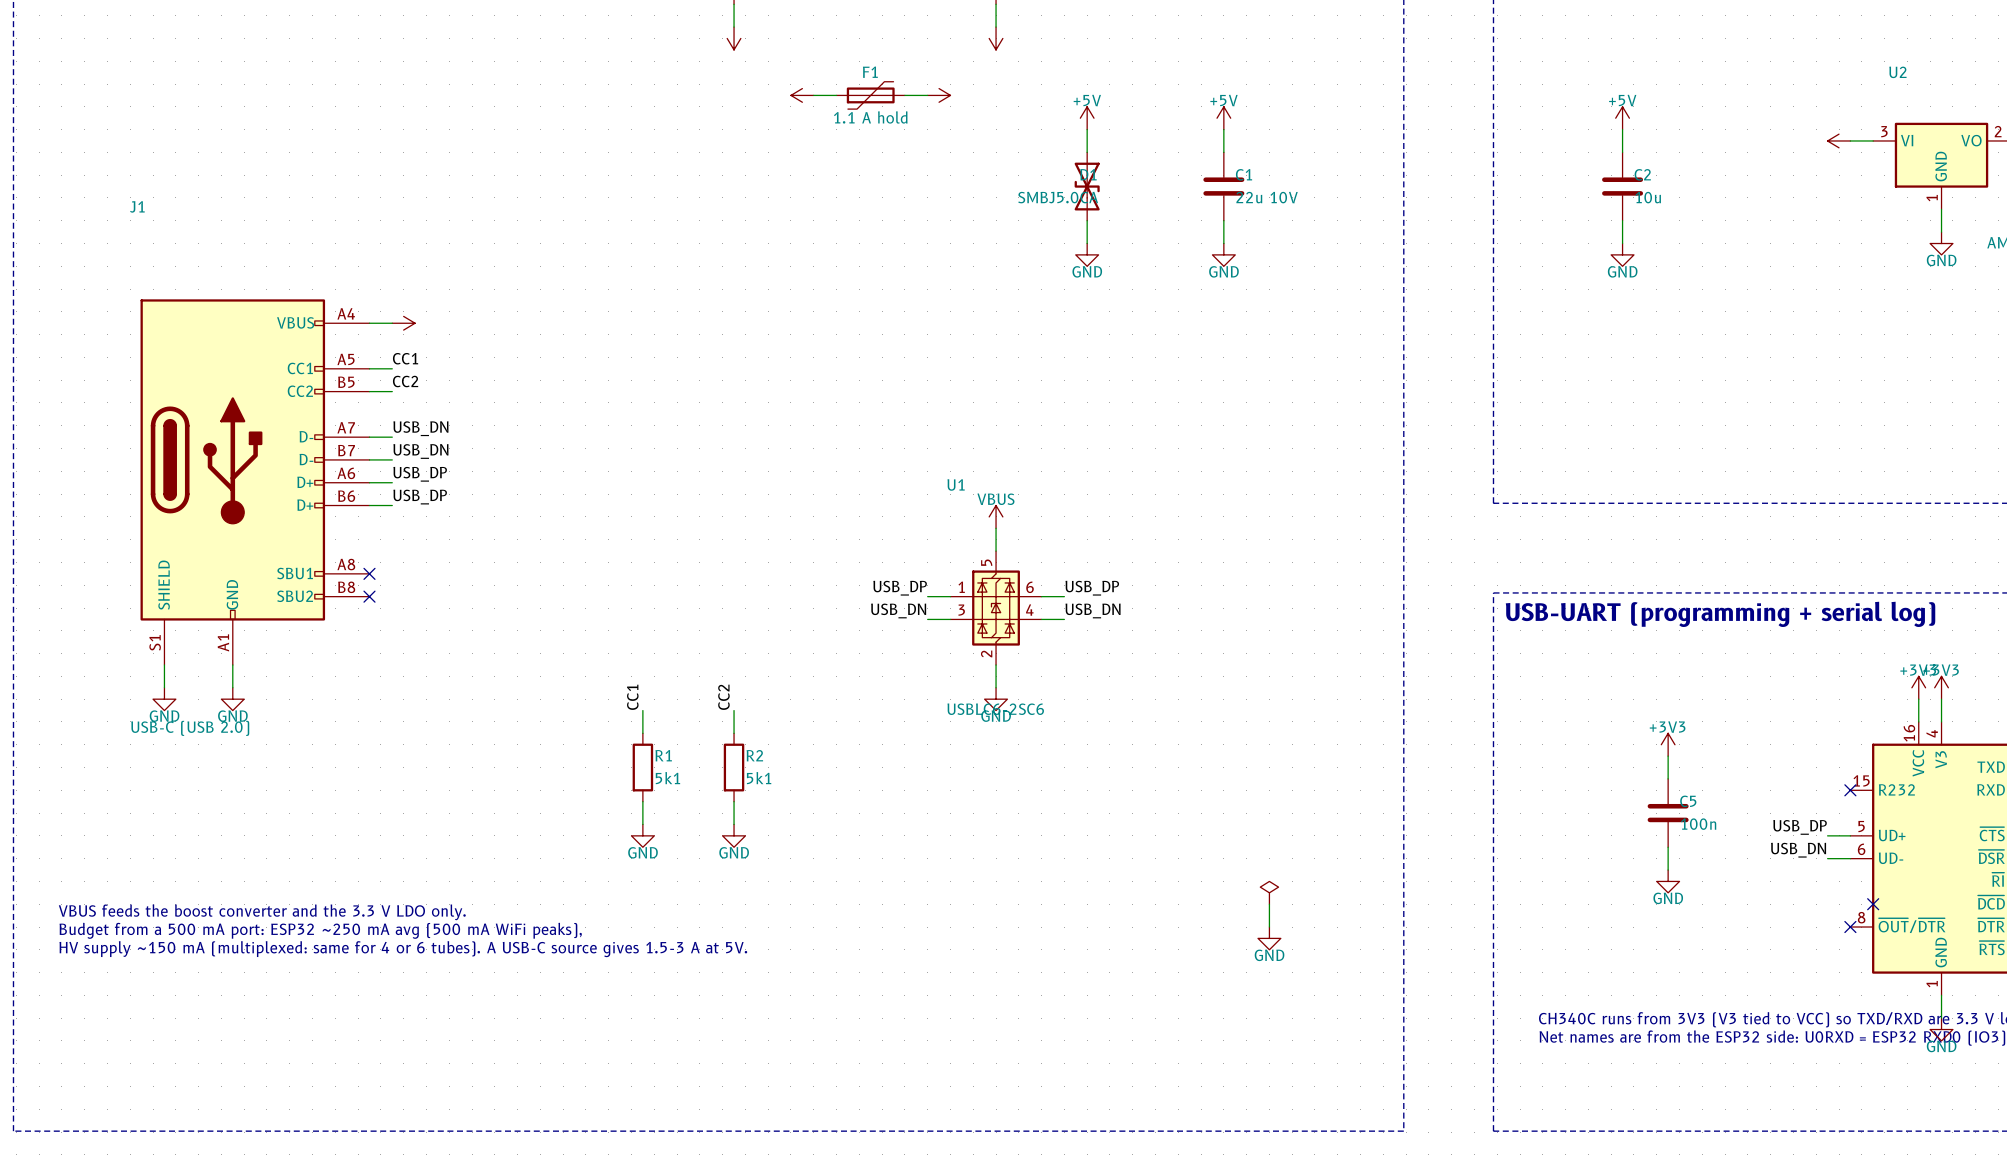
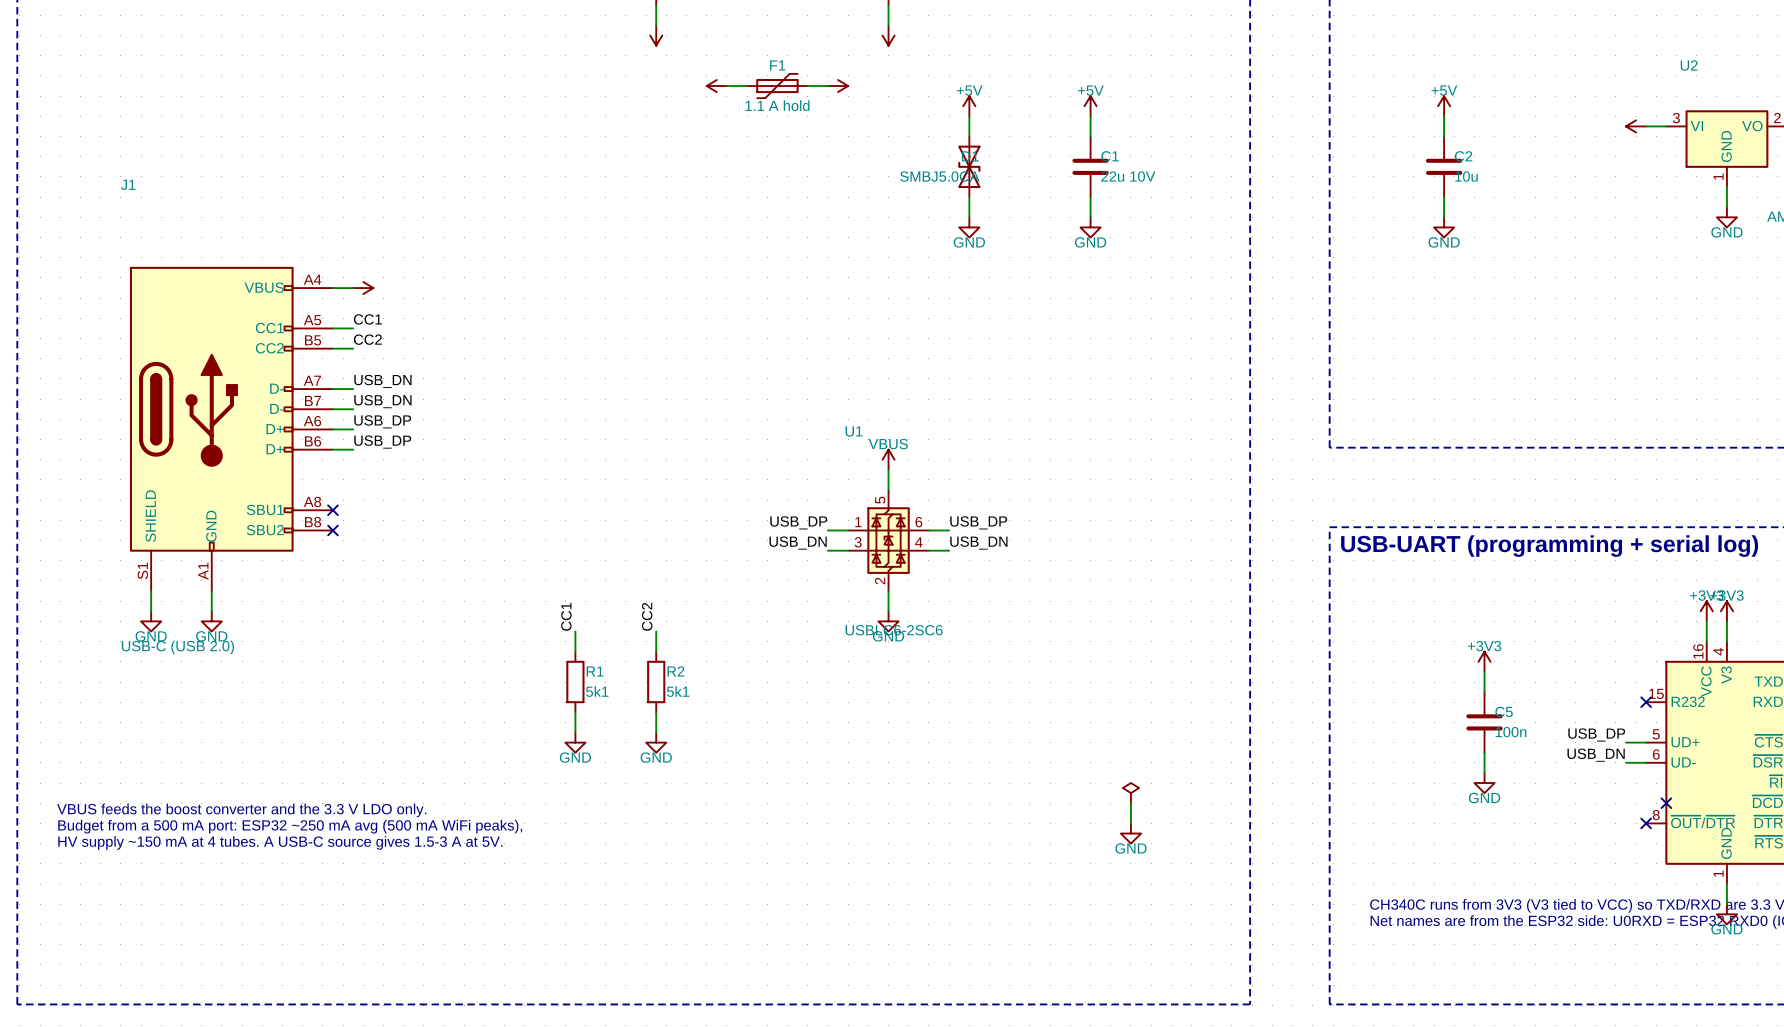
text: HV supply ~150 mA (multiplexed: same for 4 or 6 tubes). A USB-C source gives 1.5-3 A at 5V. (403, 949) -> HV supply ~150 mA at 4 tubes. A USB-C source gives 1.5-3 A at 5V. (280, 842)

